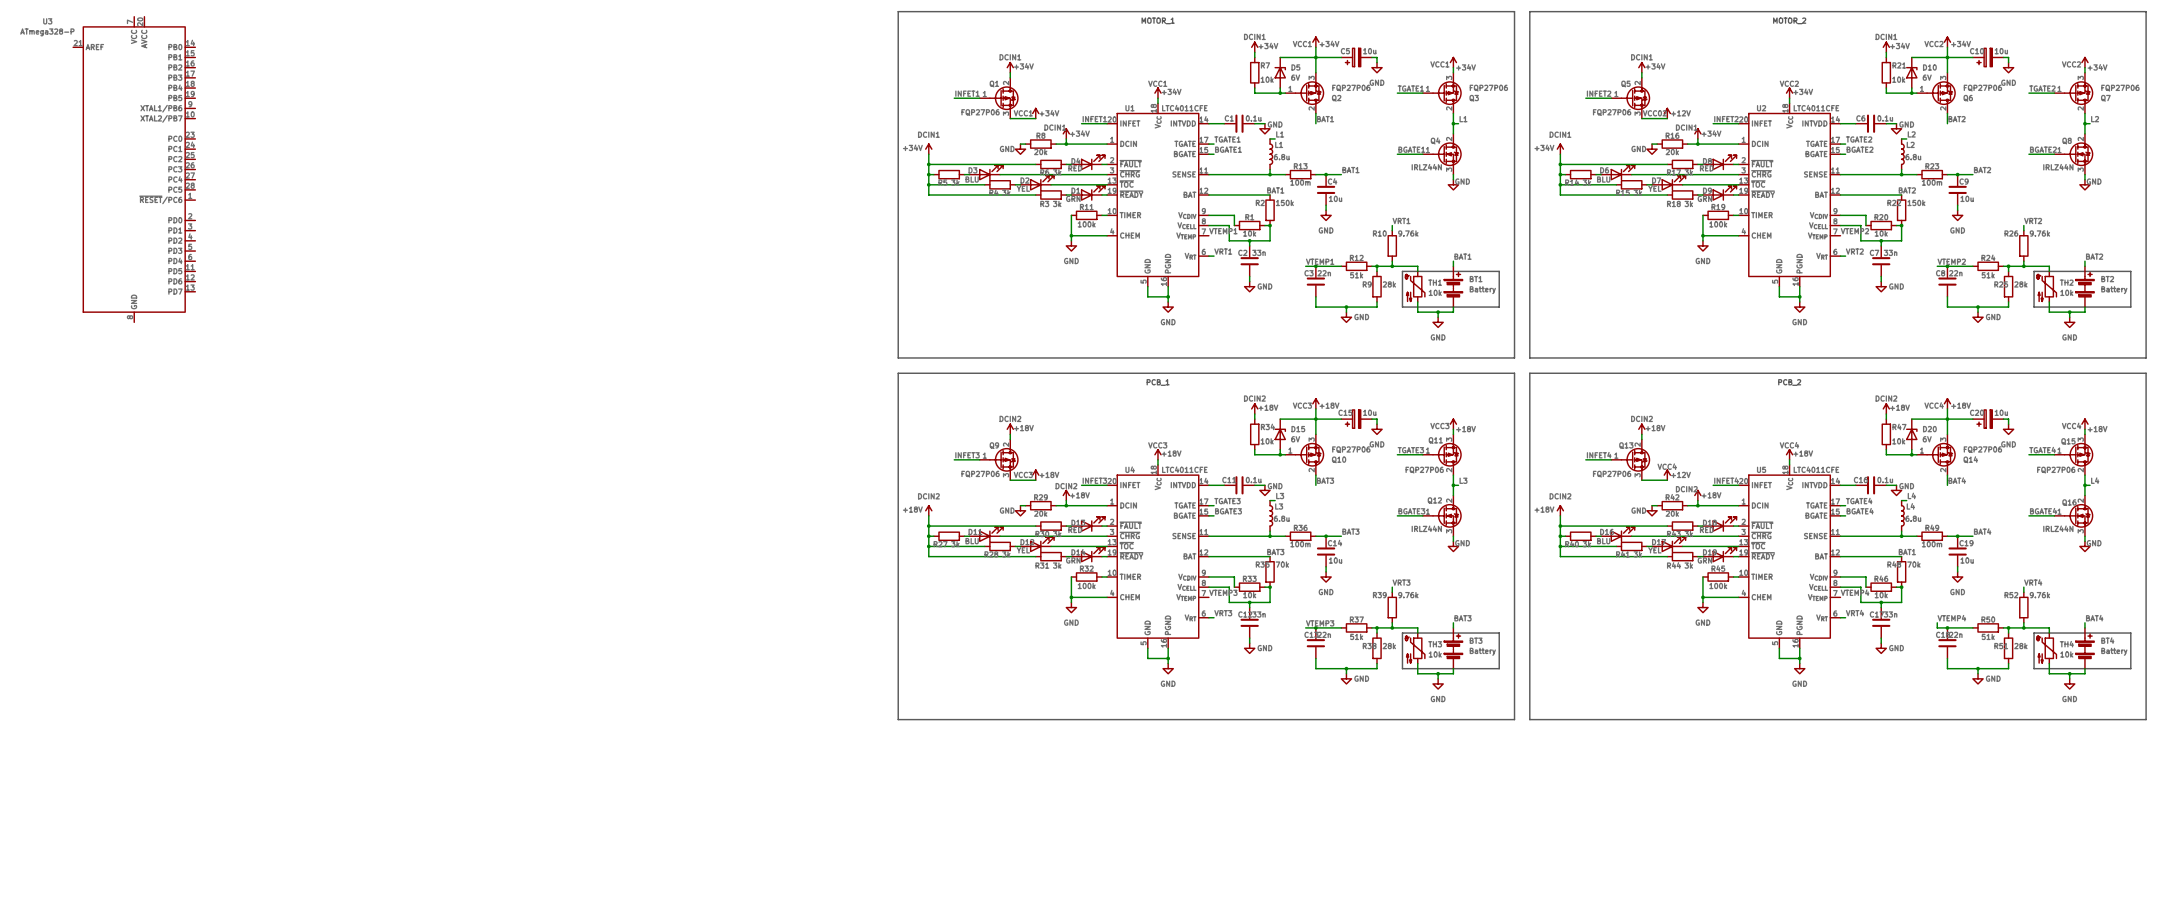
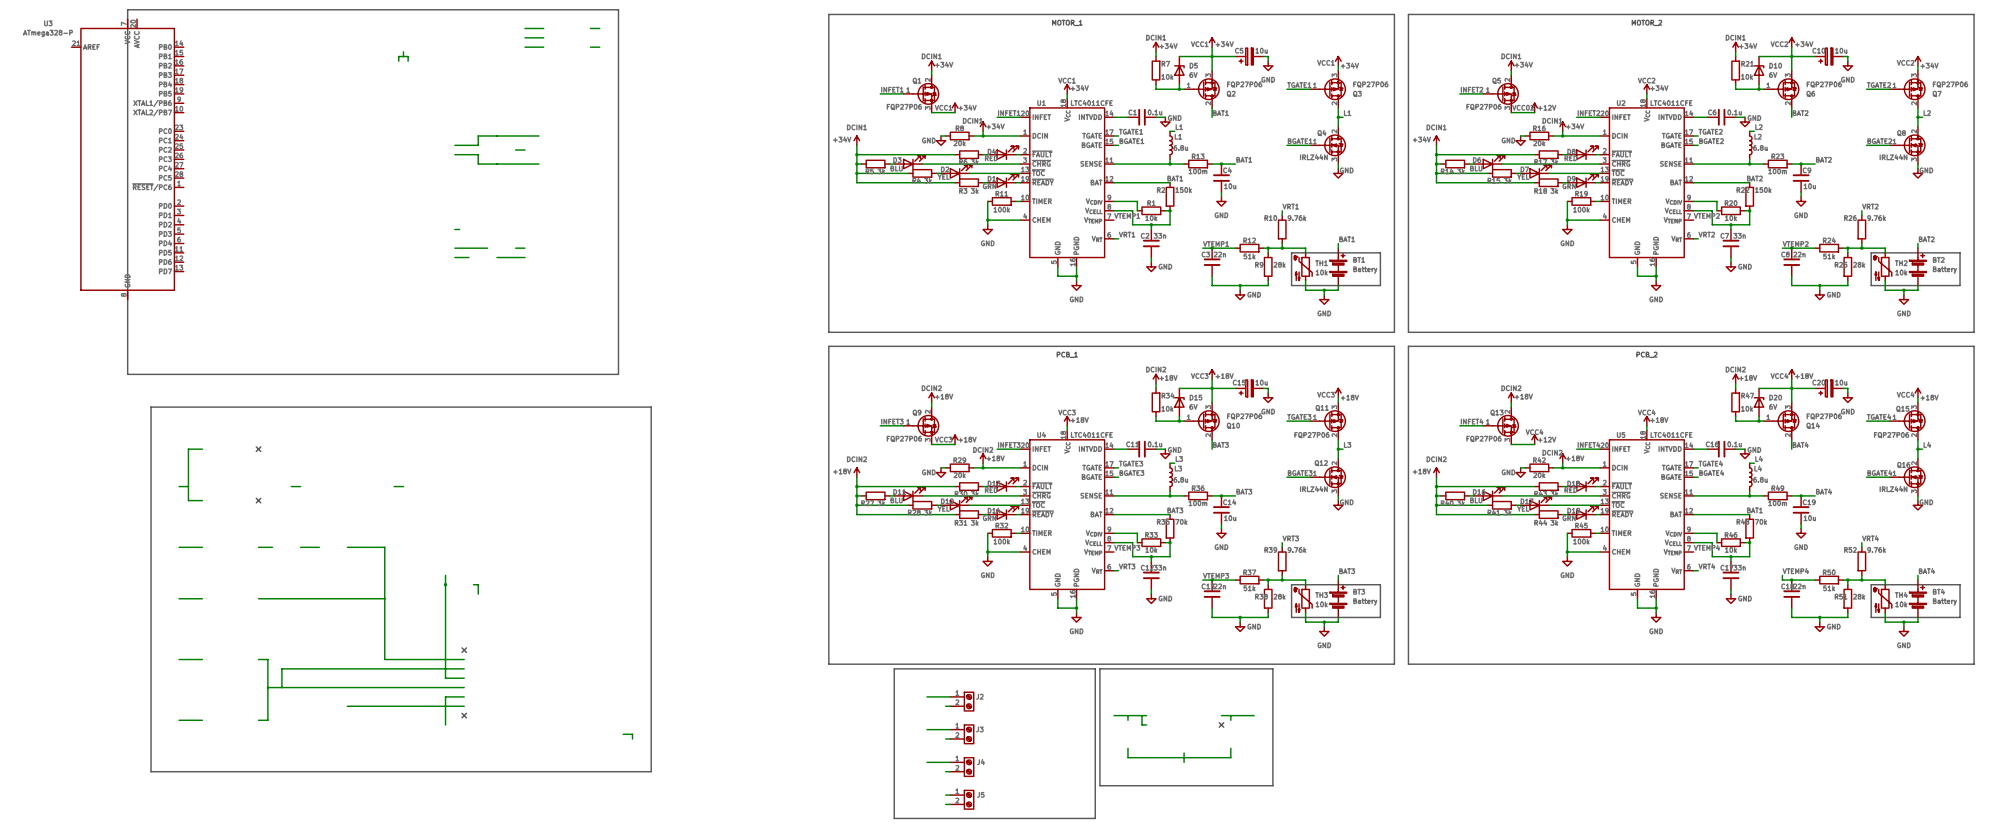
line: none -> (127, 9) (618, 9) (618, 374) (127, 374) (127, 9)
wire: none -> (524, 28) (543, 28)
wire: none -> (590, 28) (599, 28)
wire: none -> (524, 37) (543, 37)
wire: none -> (524, 47) (543, 47)
wire: none -> (590, 47) (599, 47)
wire: none -> (403, 51) (403, 56)
wire: none -> (398, 61) (398, 56) (408, 56) (408, 61)
wire: none -> (539, 135) (478, 135) (478, 145) (454, 145)
wire: none -> (515, 150) (524, 150)
wire: none -> (454, 154) (478, 154) (478, 164) (539, 164)
wire: none -> (454, 229) (459, 229)
wire: none -> (454, 248) (487, 248)
wire: none -> (515, 248) (524, 248)
wire: none -> (454, 257) (468, 257)
wire: none -> (496, 257) (524, 257)
line: none -> (151, 407) (651, 407) (651, 771) (151, 771) (151, 407)
wire: none -> (202, 449) (188, 449) (188, 500) (202, 500)
no-connect mark: none -> (258, 449)
wire: none -> (179, 486) (188, 486)
wire: none -> (291, 486) (300, 486)
wire: none -> (394, 486) (403, 486)
no-connect mark: none -> (258, 500)
wire: none -> (179, 547) (202, 547)
wire: none -> (258, 547) (272, 547)
wire: none -> (300, 547) (319, 547)
wire: none -> (347, 547) (384, 547) (384, 659) (464, 659)
wire: none -> (445, 575) (445, 678) (464, 678)
junction: none -> (445, 584)
wire: none -> (473, 584) (478, 584) (478, 594)
wire: none -> (179, 598) (202, 598)
wire: none -> (258, 598) (384, 598)
no-connect mark: none -> (464, 650)
wire: none -> (179, 659) (202, 659)
wire: none -> (258, 659) (267, 659) (267, 720) (258, 720)
wire: none -> (464, 668) (281, 668) (281, 687)
line: none -> (894, 668) (1095, 668) (1095, 818) (894, 818) (894, 668)
line: none -> (1099, 668) (1272, 668) (1272, 785) (1099, 785) (1099, 668)
wire: none -> (267, 687) (464, 687)
wire: none -> (464, 696) (445, 696) (445, 724)
wire: none -> (926, 696) (950, 696)
part: none -> (962, 701)
wire: none -> (347, 706) (464, 706)
wire: none -> (945, 706) (950, 706)
no-connect mark: none -> (464, 715)
wire: none -> (1113, 715) (1146, 715)
wire: none -> (1127, 715) (1127, 720)
wire: none -> (1142, 715) (1142, 724) (1146, 724)
wire: none -> (1221, 715) (1254, 715)
wire: none -> (1230, 715) (1230, 720)
wire: none -> (179, 720) (202, 720)
no-connect mark: none -> (1221, 724)
wire: none -> (926, 729) (950, 729)
wire: none -> (623, 734) (632, 734) (632, 738)
part: none -> (962, 734)
wire: none -> (945, 738) (950, 738)
wire: none -> (1127, 748) (1127, 757) (1230, 757) (1230, 748)
wire: none -> (1184, 753) (1184, 762)
wire: none -> (926, 762) (950, 762)
part: none -> (962, 767)
wire: none -> (945, 771) (950, 771)
wire: none -> (945, 795) (950, 795)
part: none -> (962, 799)
wire: none -> (945, 804) (950, 804)

